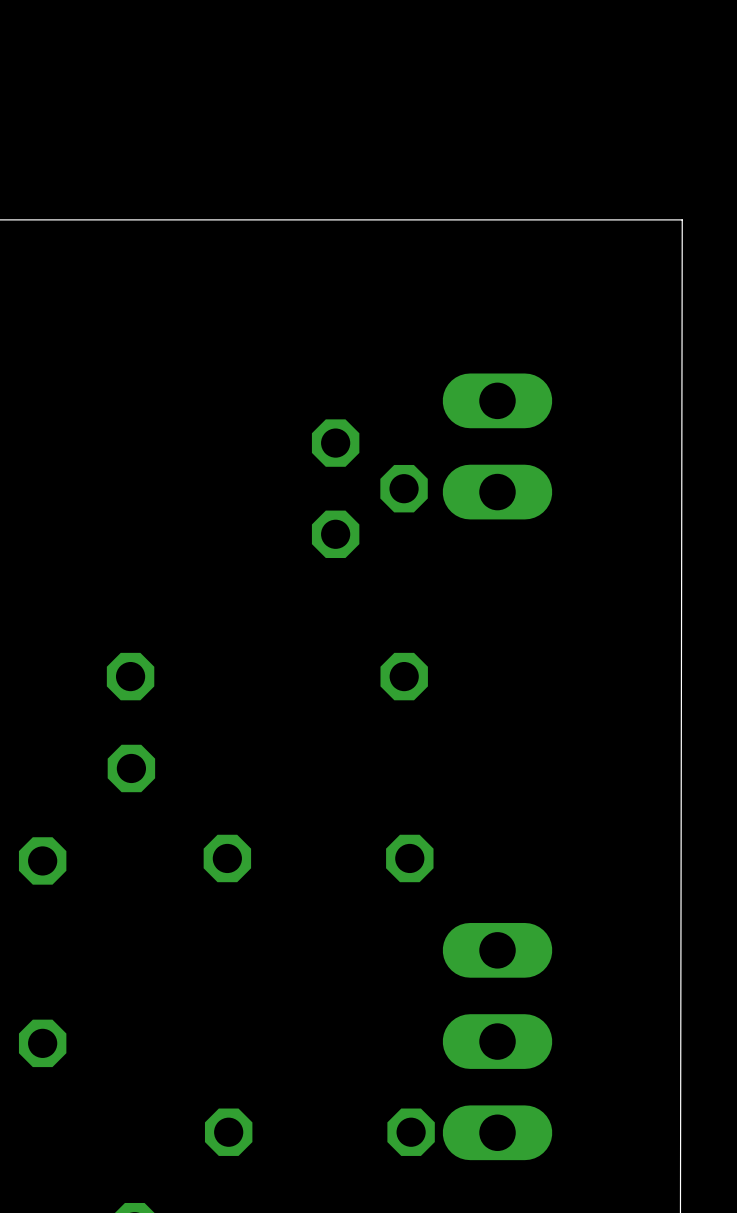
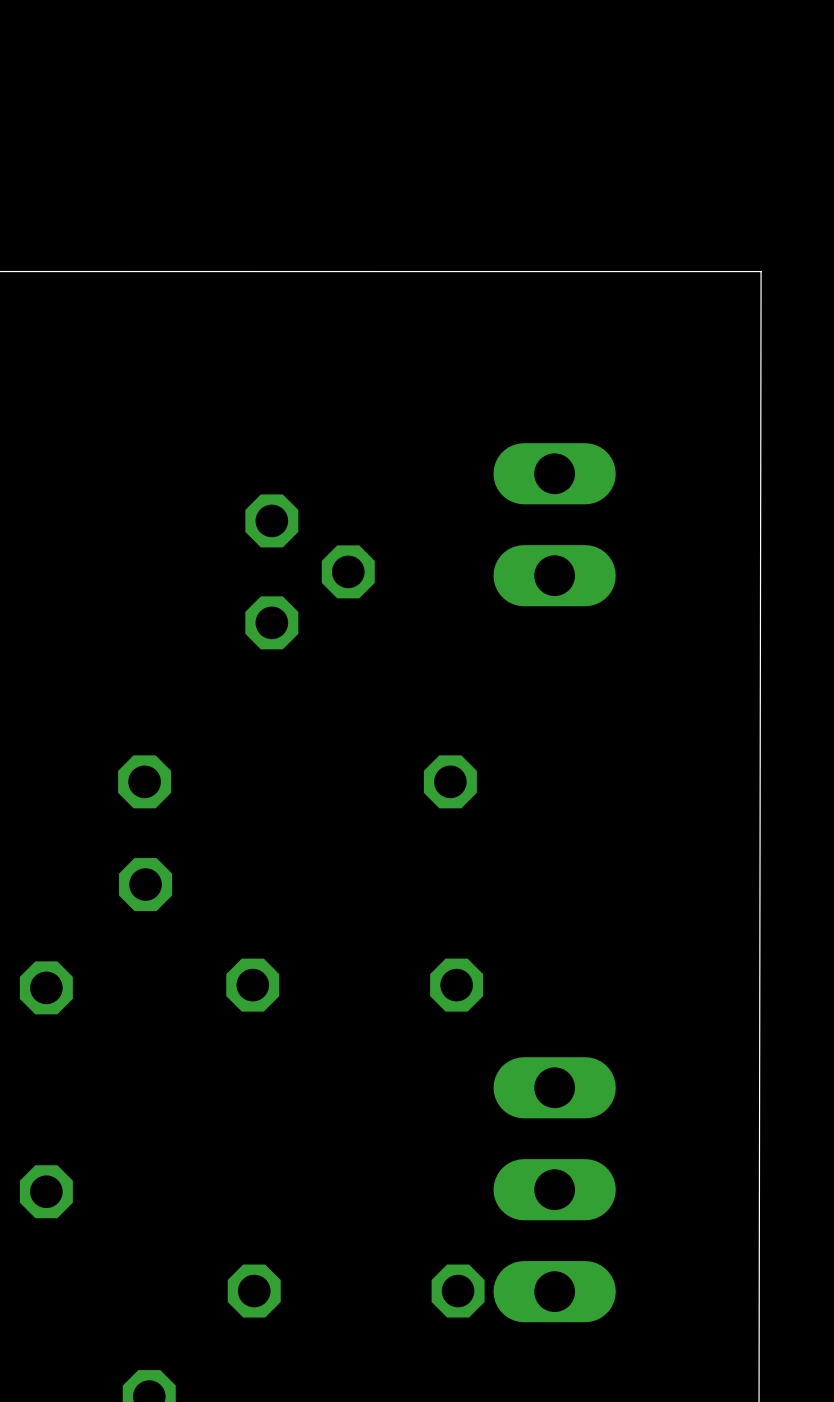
part position: (369, 488) -> (310, 571)

